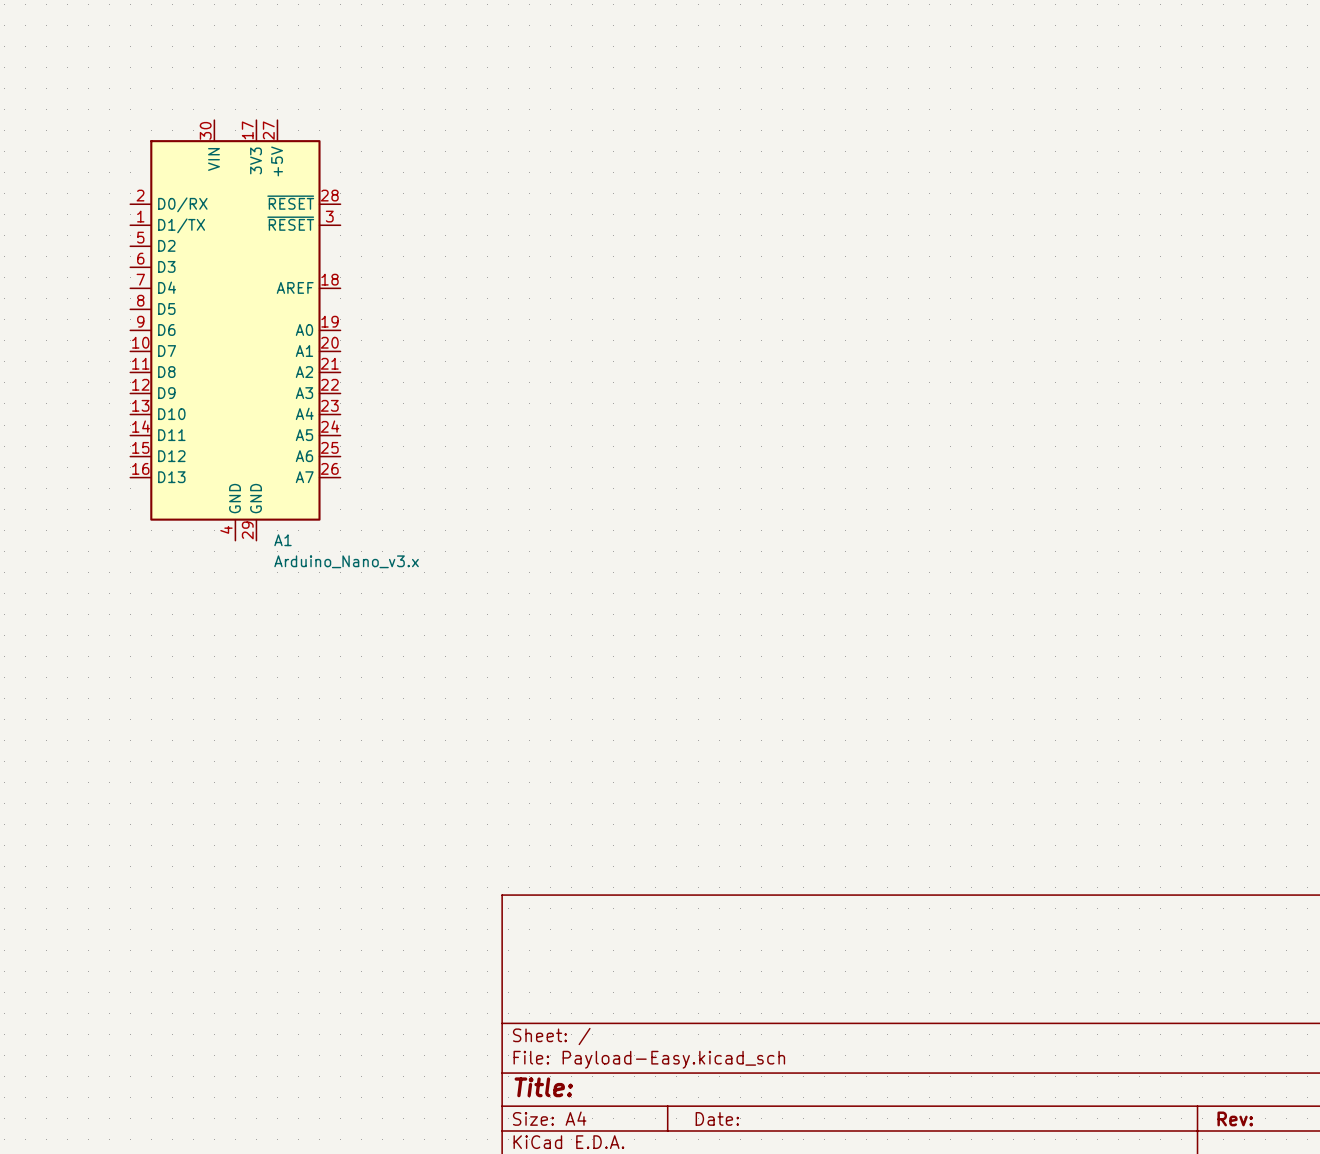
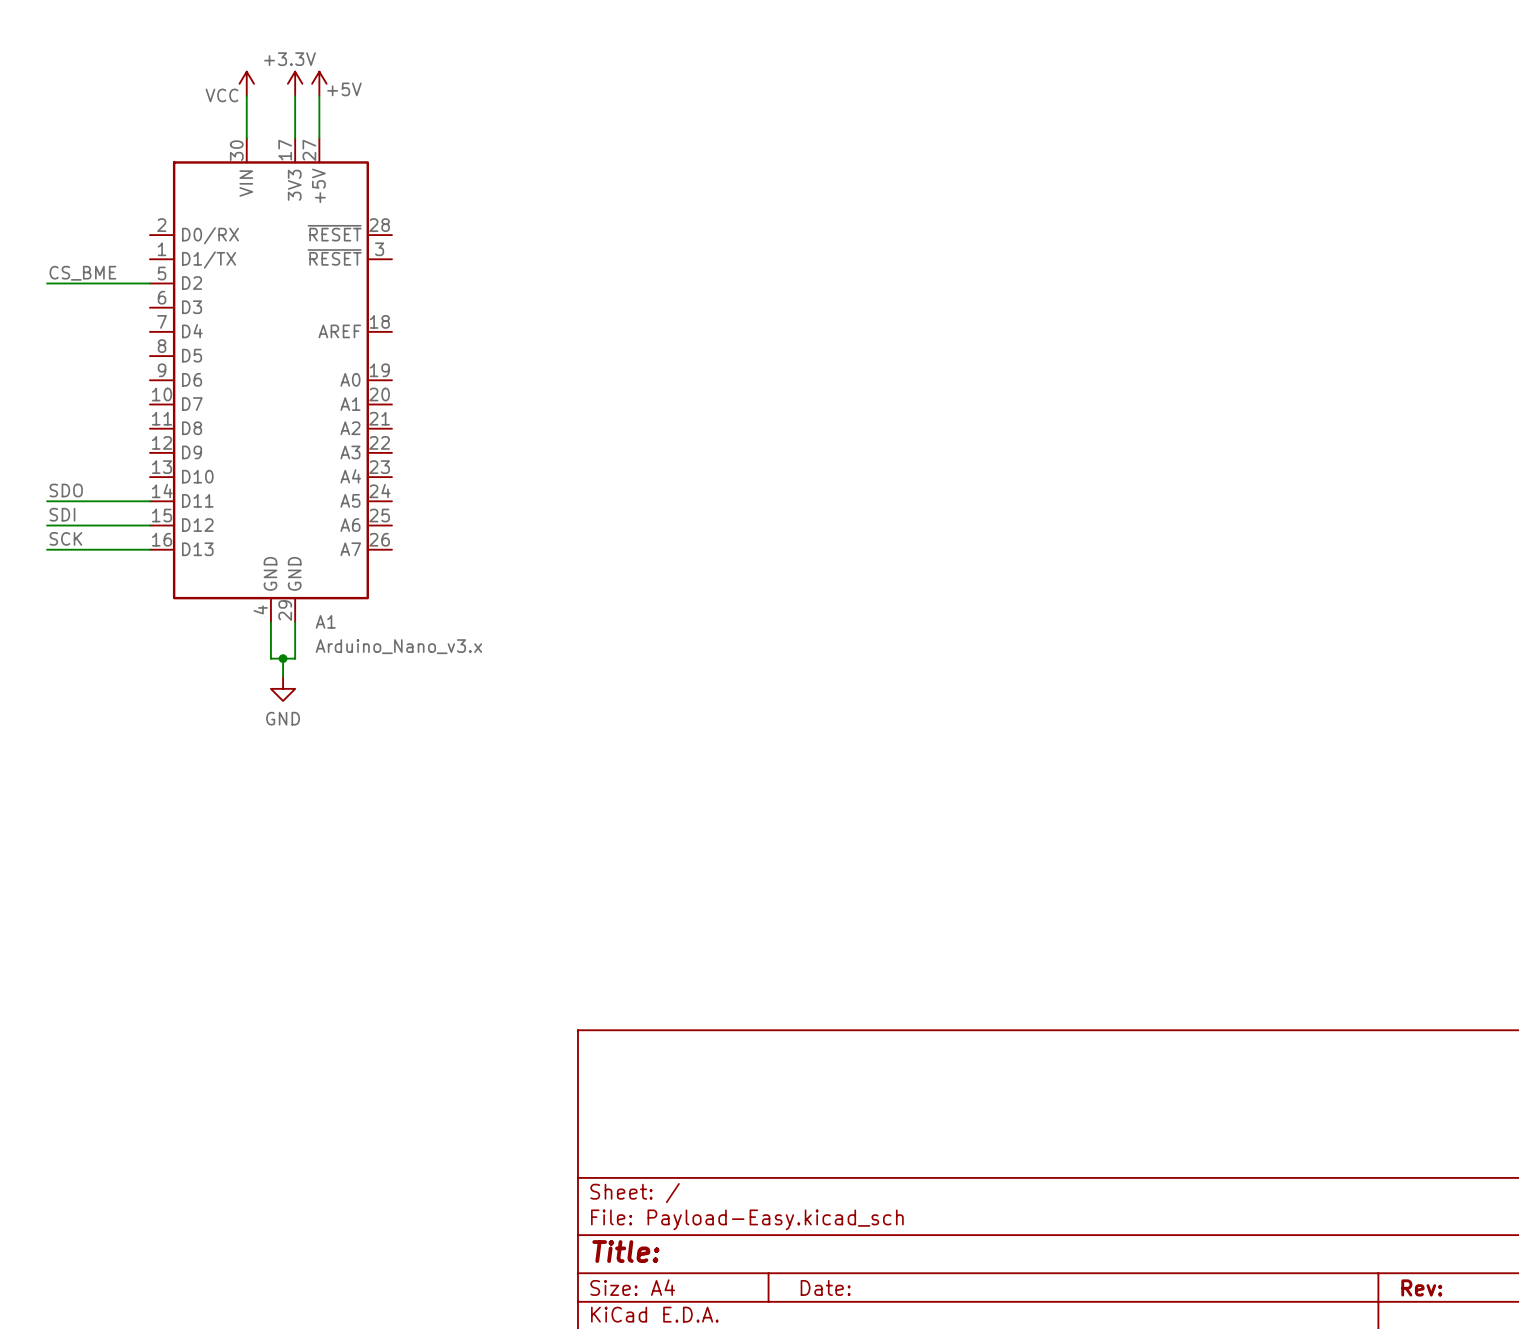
power symbol: none -> VCC (246, 83)
power symbol: none -> +3.3V (295, 83)
power symbol: none -> +5V (319, 83)
wire: none -> (246, 95) (246, 138)
wire: none -> (295, 95) (295, 138)
wire: none -> (319, 95) (319, 138)
label: none -> CS_BME (82, 273)
wire: none -> (47, 283) (149, 283)
label: none -> SDO (66, 490)
wire: none -> (47, 501) (149, 501)
label: none -> SDI (62, 514)
wire: none -> (47, 525) (149, 525)
label: none -> SCK (65, 538)
wire: none -> (47, 549) (149, 549)
wire: none -> (270, 622) (270, 658) (295, 658) (295, 622)
wire: none -> (283, 658) (283, 676)
junction: none -> (283, 658)
power symbol: none -> GND (283, 688)

